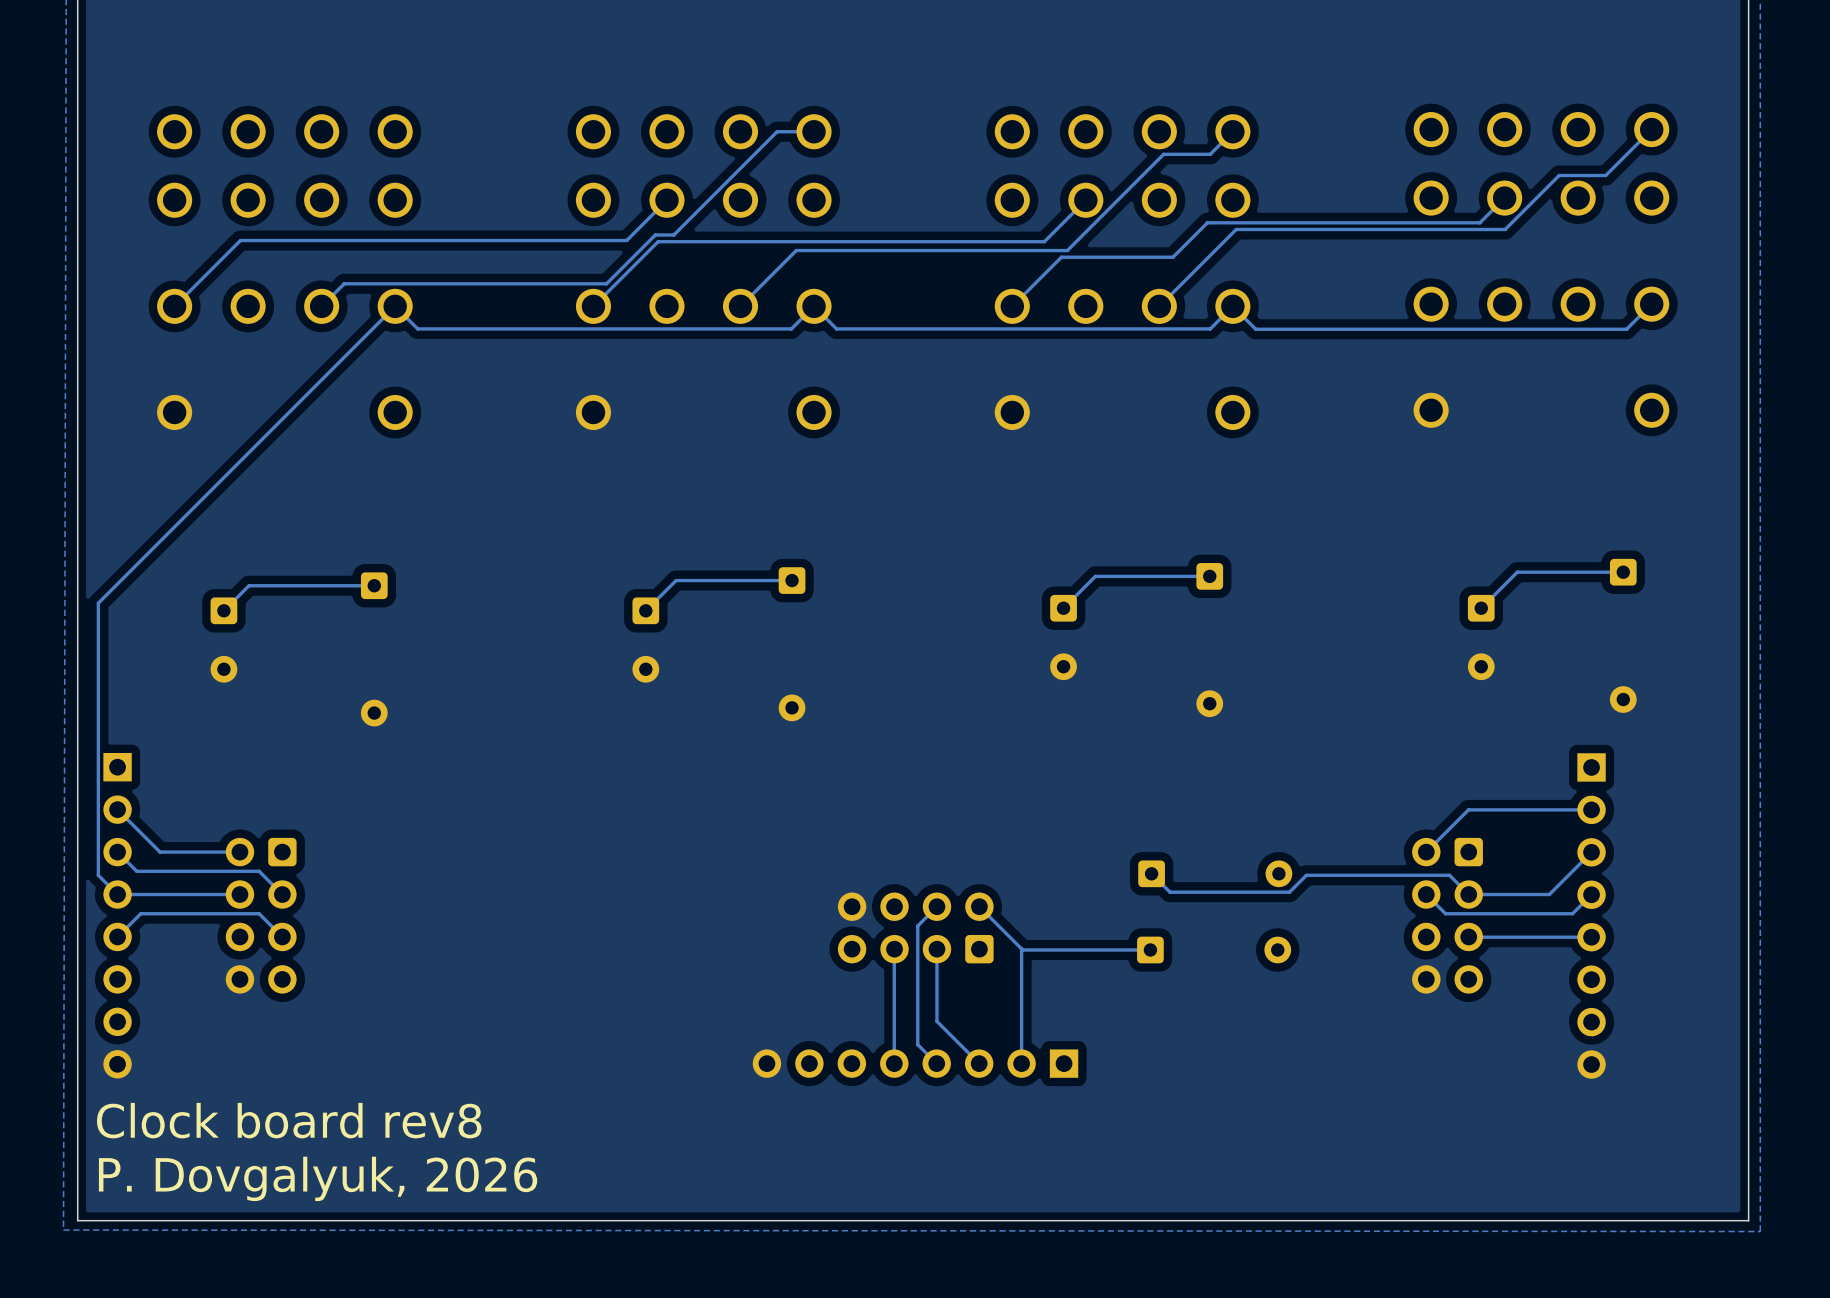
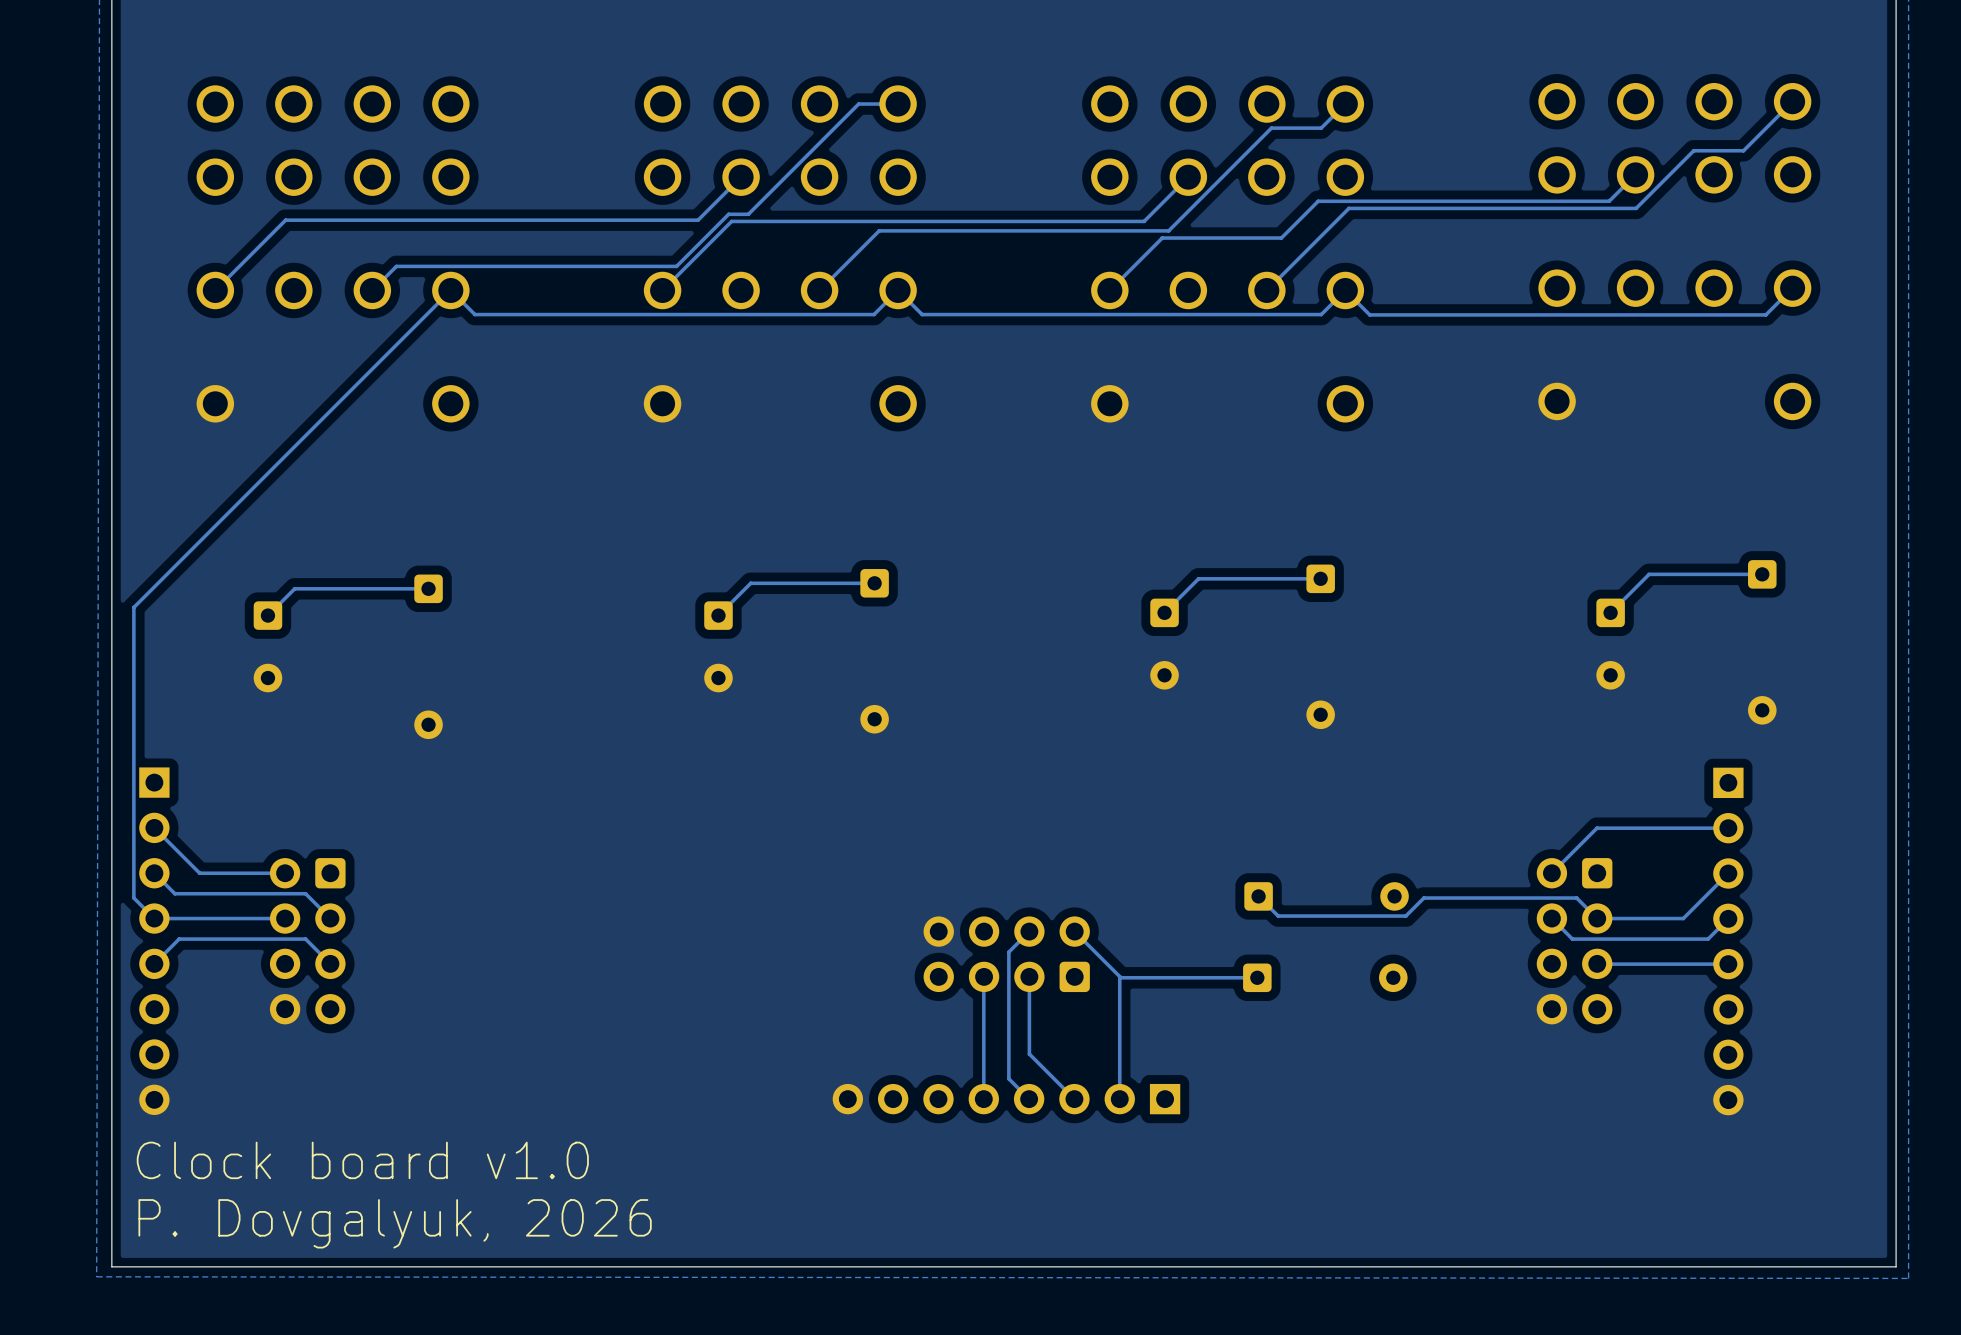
text: Clock board rev8 (289, 1120) -> Clock board v1.0 (362, 1160)

